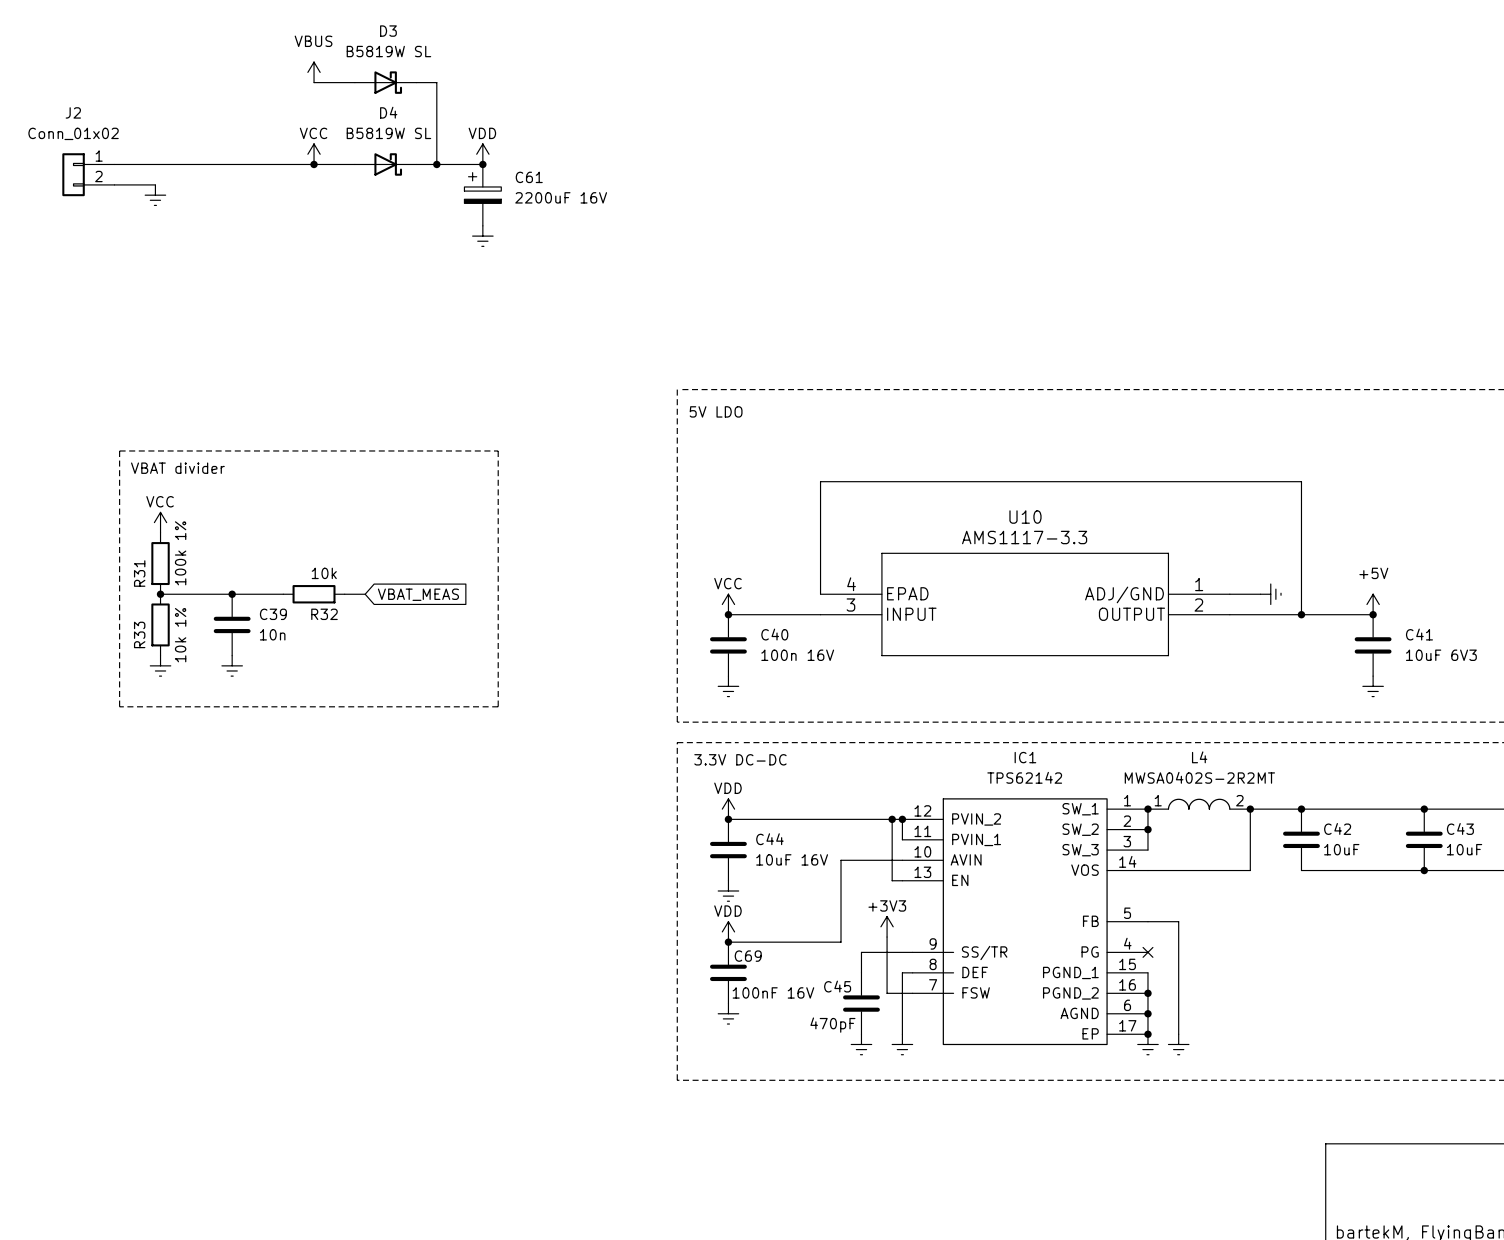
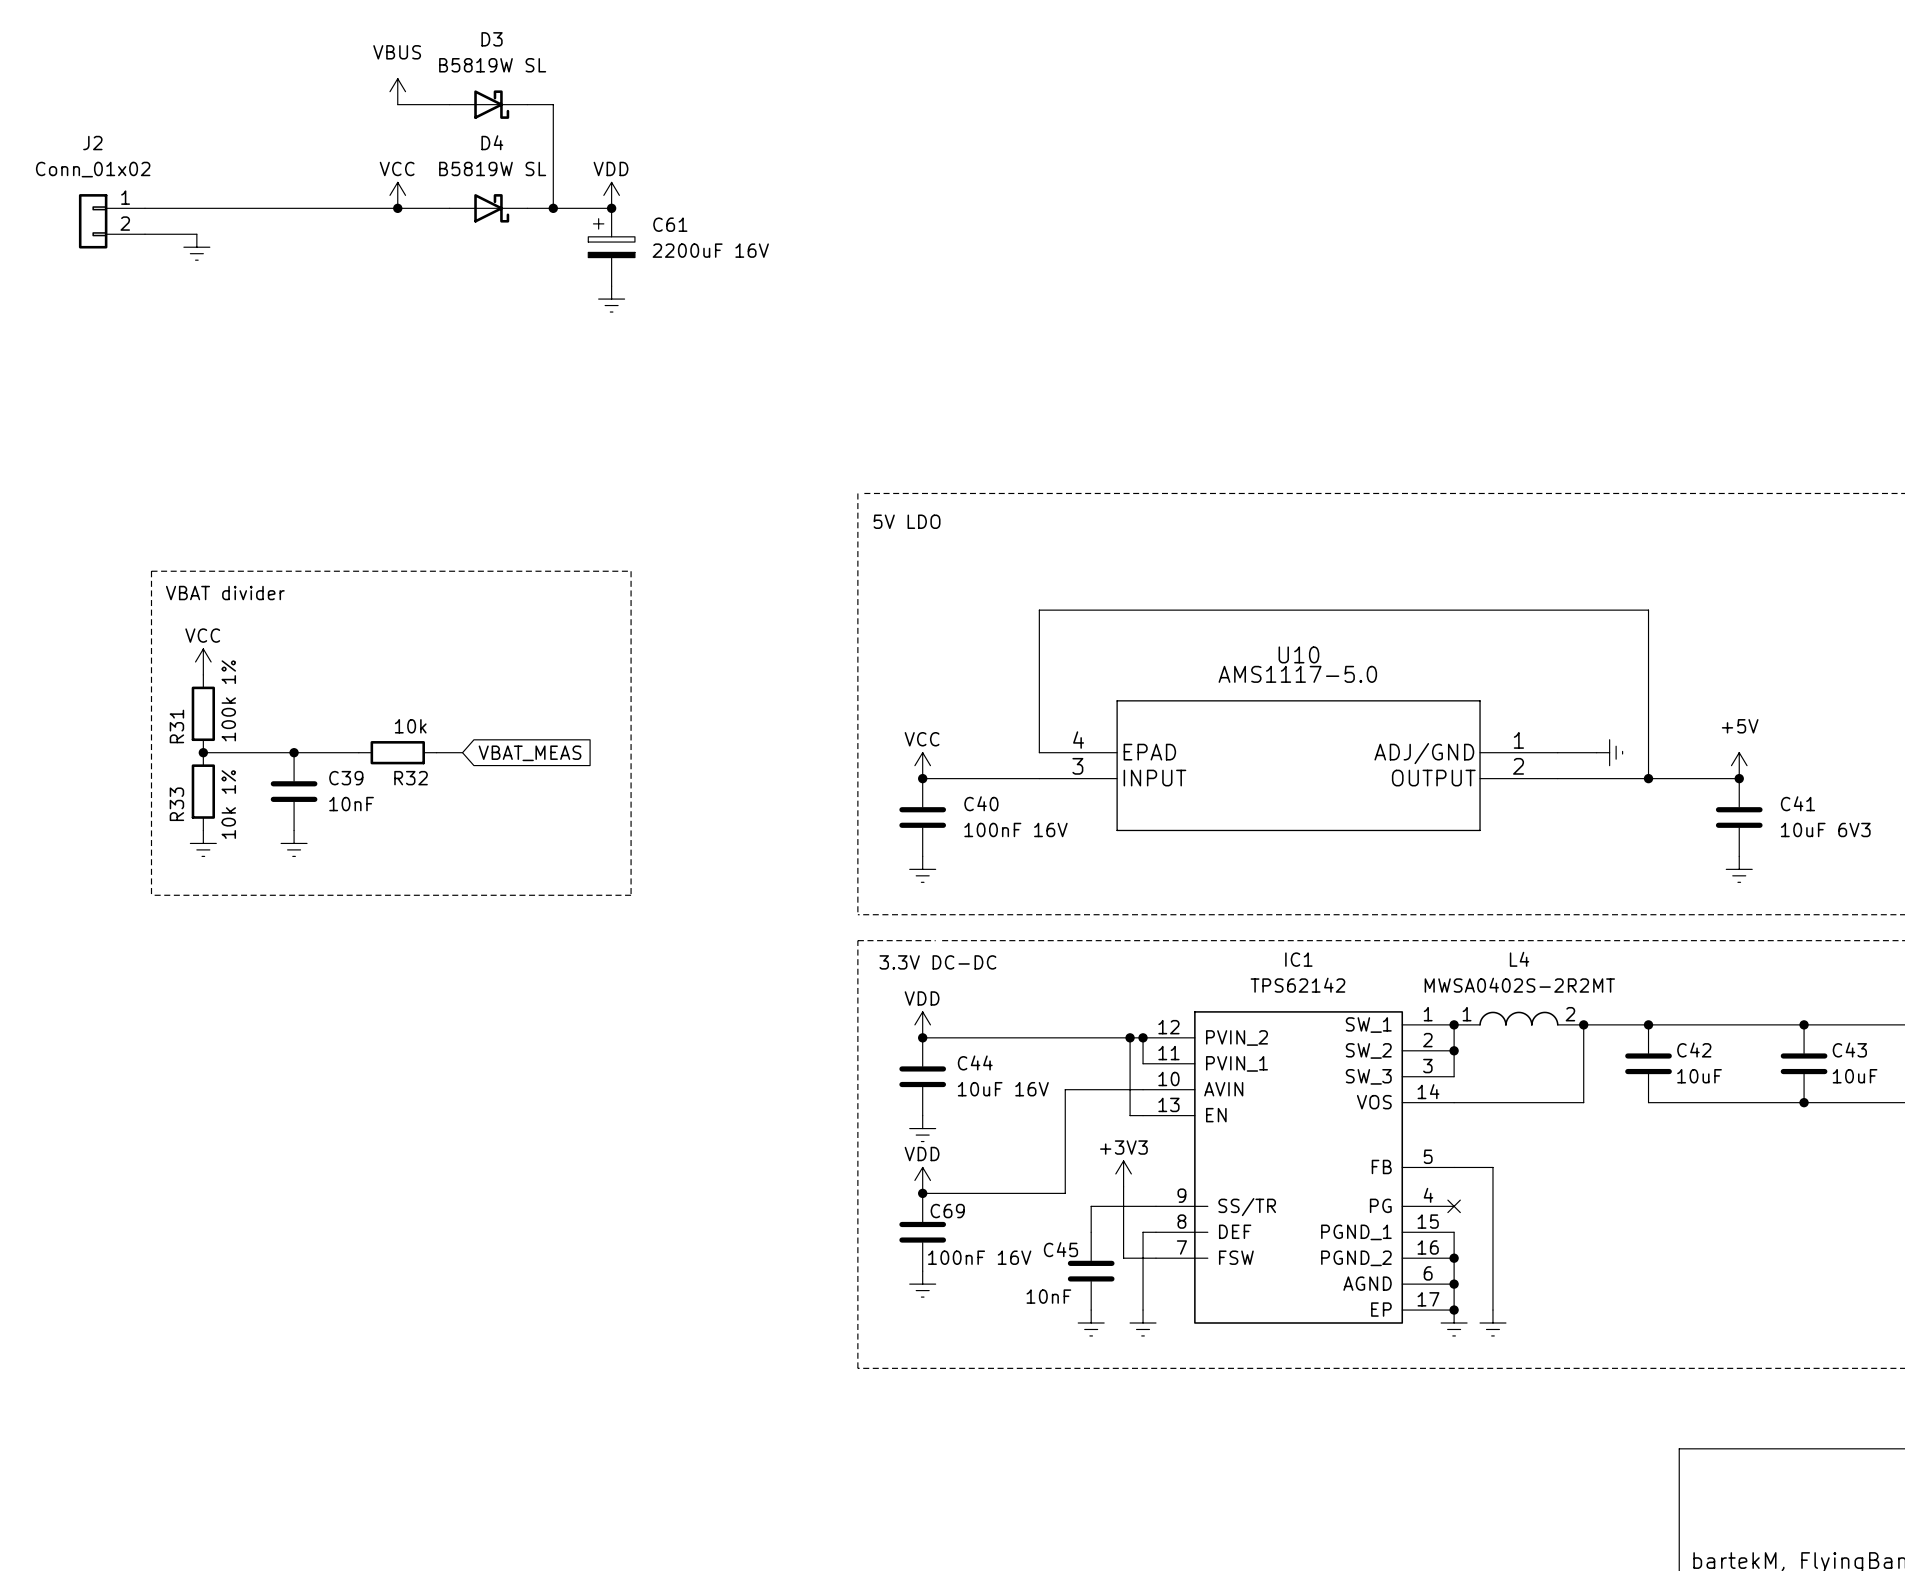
U10 value: AMS1117-3.3 (1024, 537) -> AMS1117-5.0 (1297, 674)
C39 value: 10n (272, 634) -> 10nF (351, 804)
C40 value: 100n 16V (797, 655) -> 100nF 16V (1015, 829)
C45 value: 470pF (832, 1025) -> 10nF (1048, 1296)

